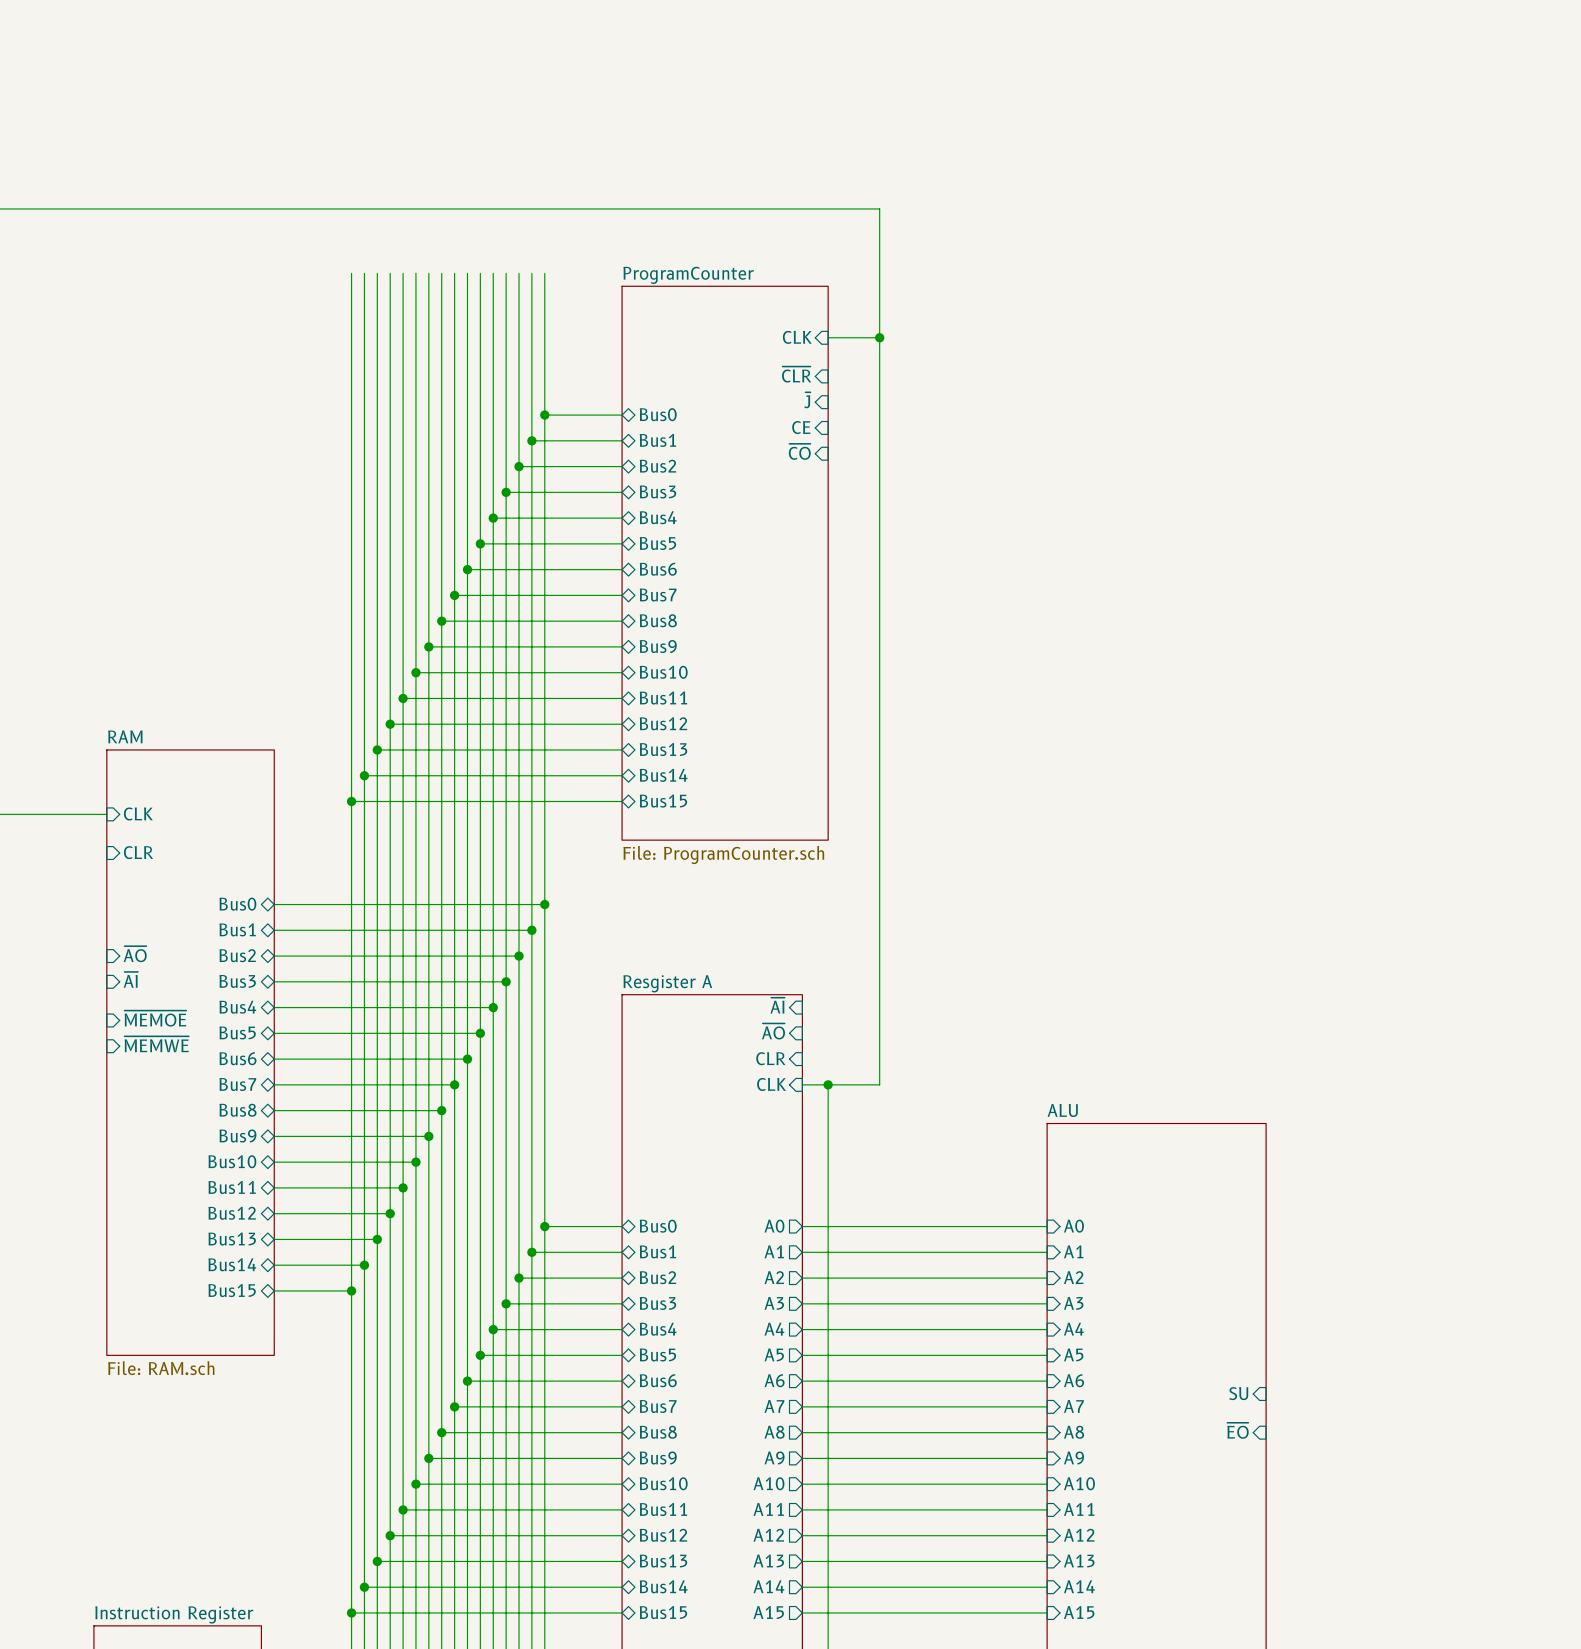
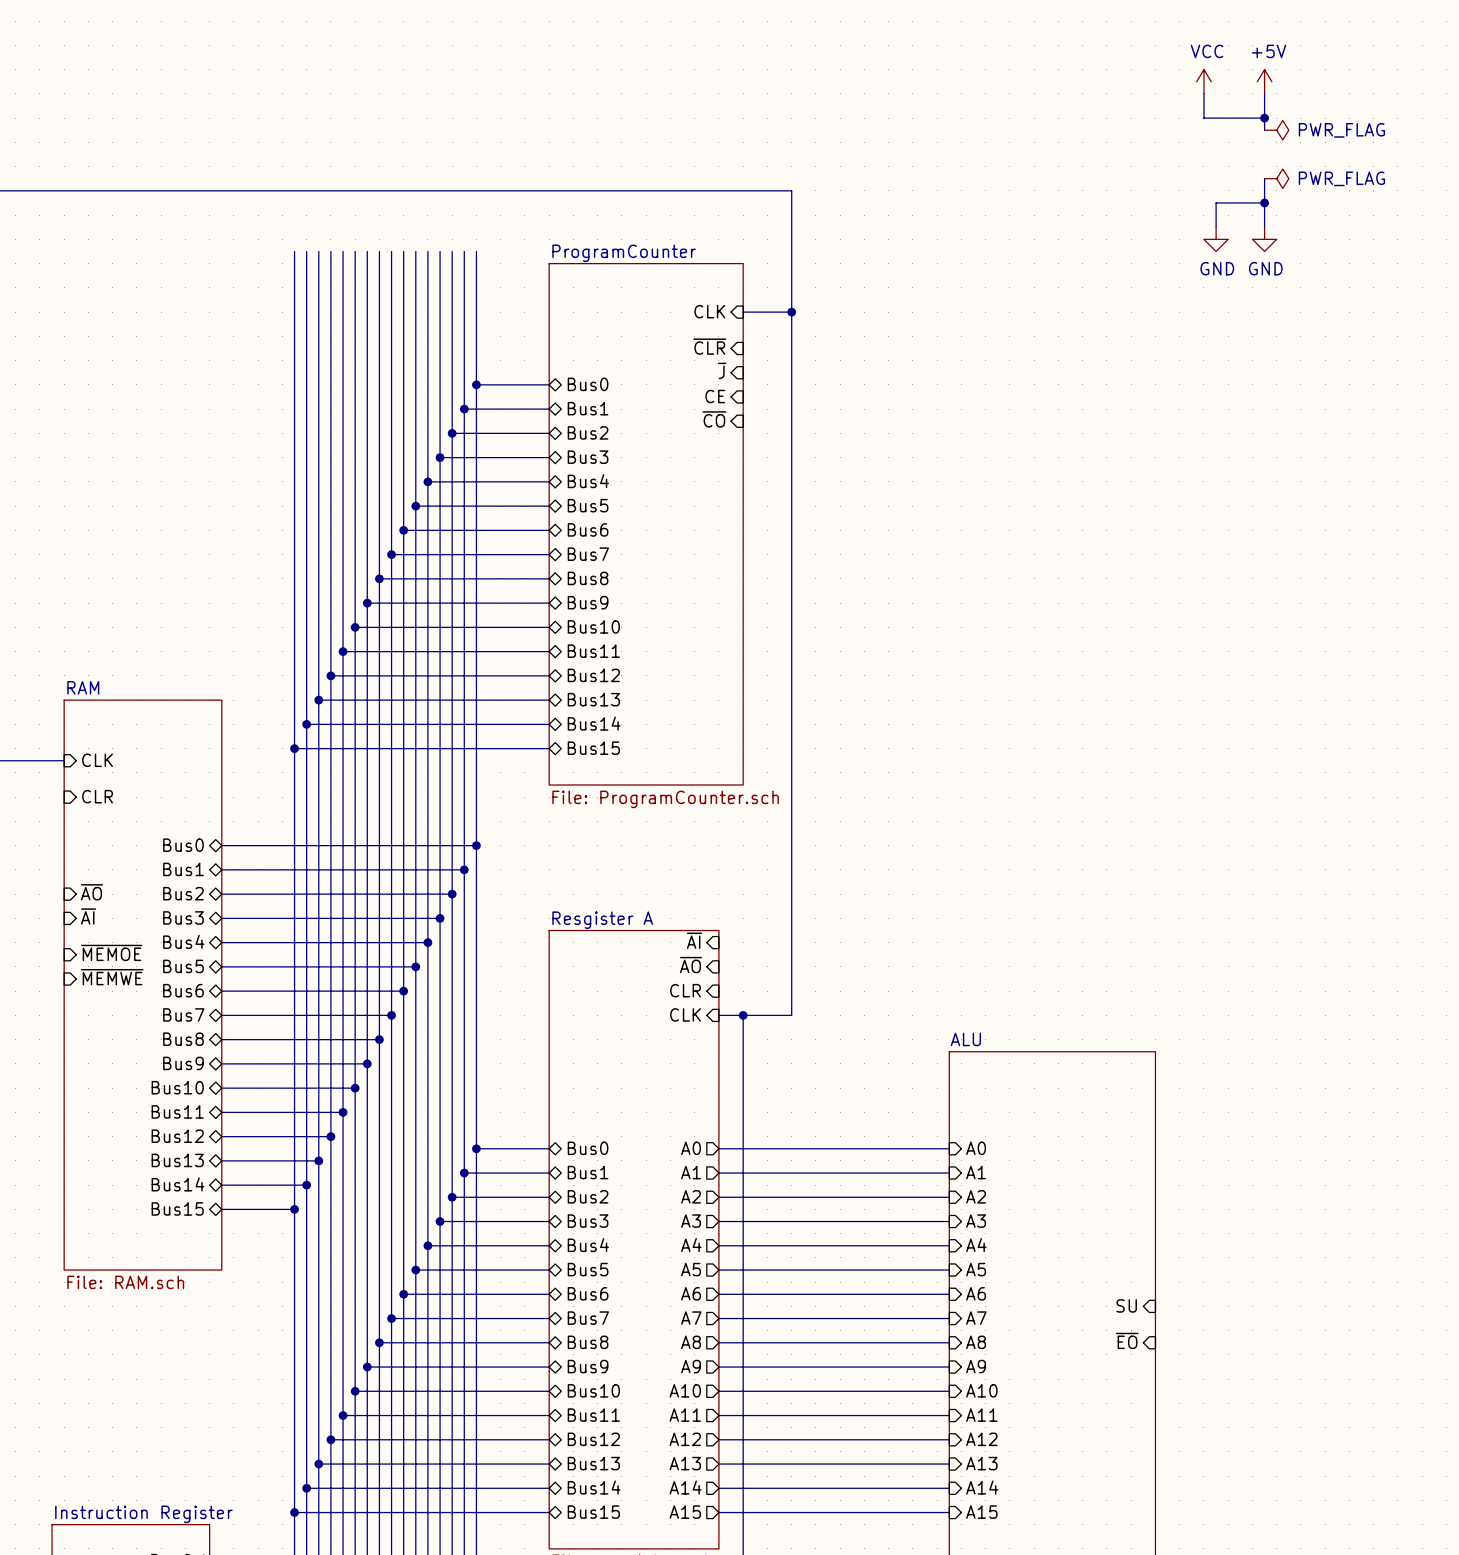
power symbol: none -> VCC (1203, 81)
power symbol: none -> +5V (1264, 81)
wire: none -> (1203, 93) (1203, 118) (1264, 118)
wire: none -> (1264, 93) (1264, 130)
junction: none -> (1264, 118)
power symbol: none -> PWR_FLAG (1276, 130)
wire: none -> (1264, 178) (1264, 227)
power symbol: none -> PWR_FLAG (1276, 178)
wire: none -> (1264, 202) (1216, 202) (1216, 227)
junction: none -> (1264, 202)
power symbol: none -> GND (1216, 239)
power symbol: none -> GND (1264, 239)

